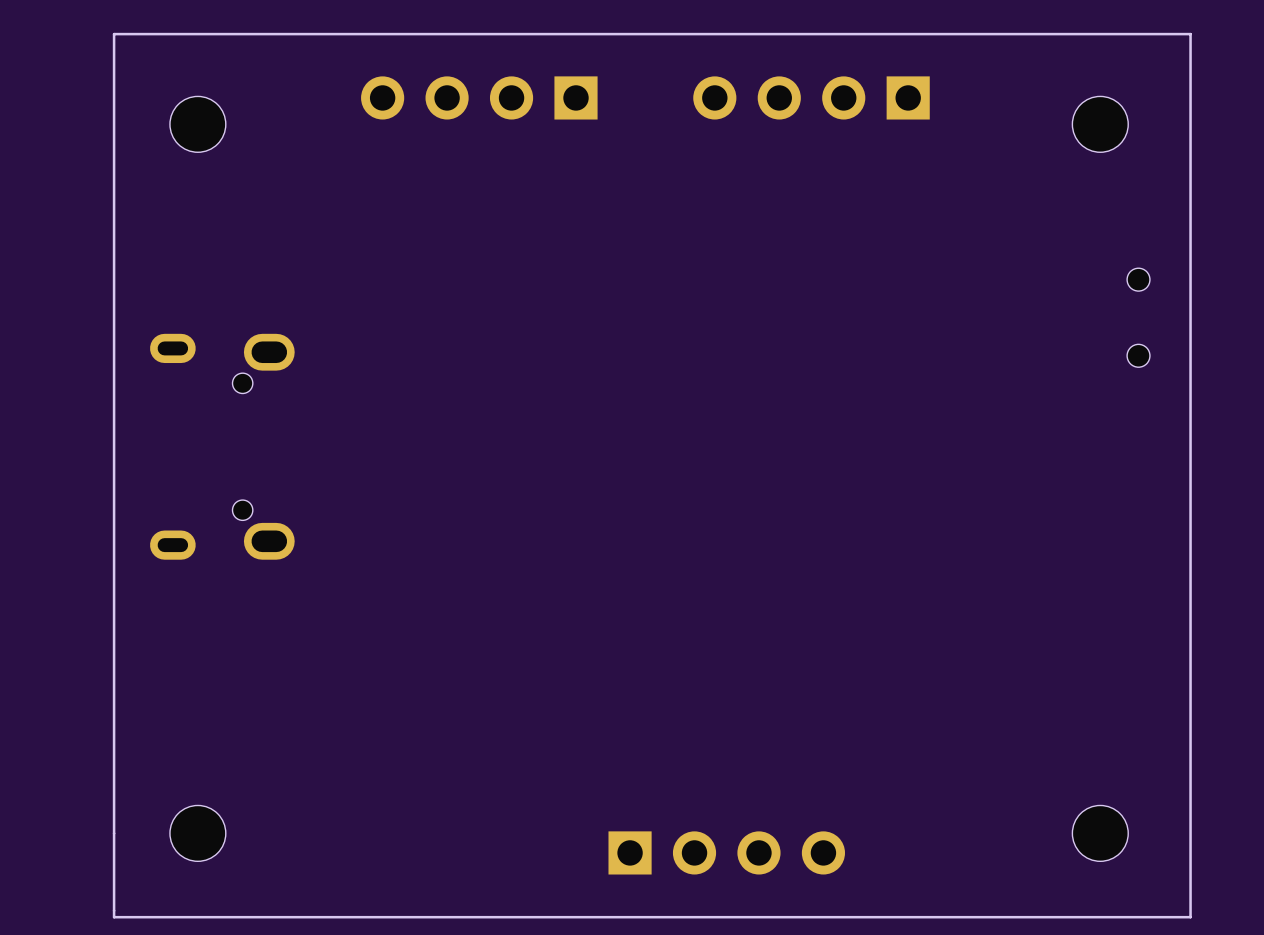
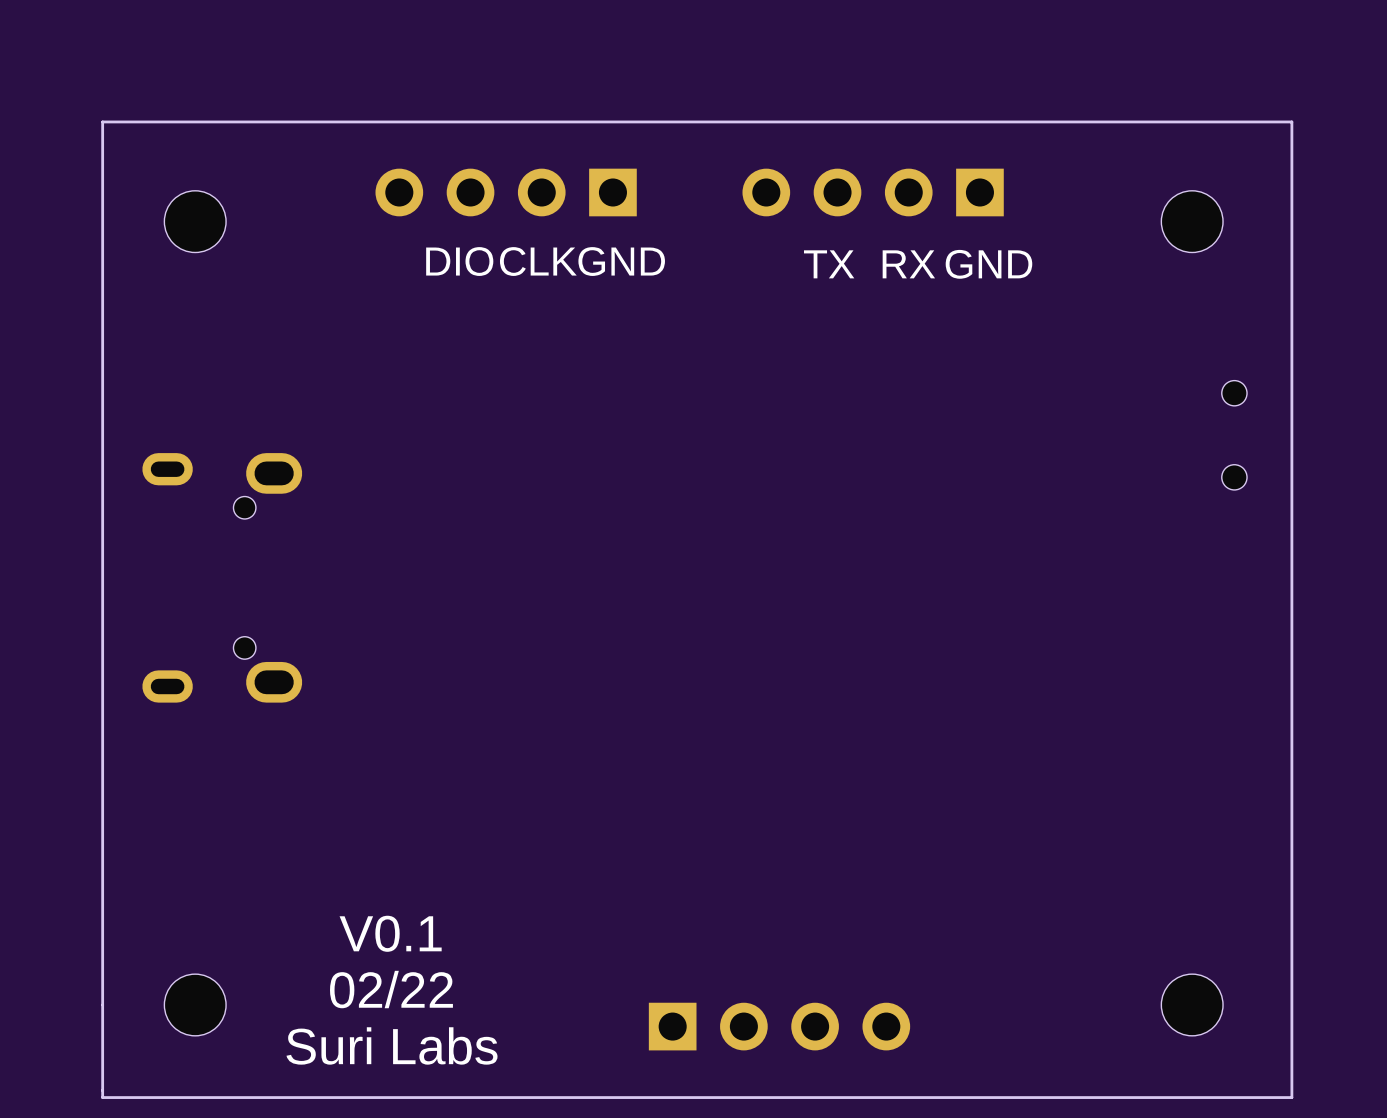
text: none -> DIO (459, 261)
text: none -> CLK (538, 261)
text: none -> GND (621, 261)
text: none -> TX (829, 264)
text: none -> RX (908, 264)
text: none -> GND (988, 264)
text: none -> V0.1 (390, 933)
text: none -> 02/22 (391, 989)
text: none -> Suri Labs (391, 1045)

